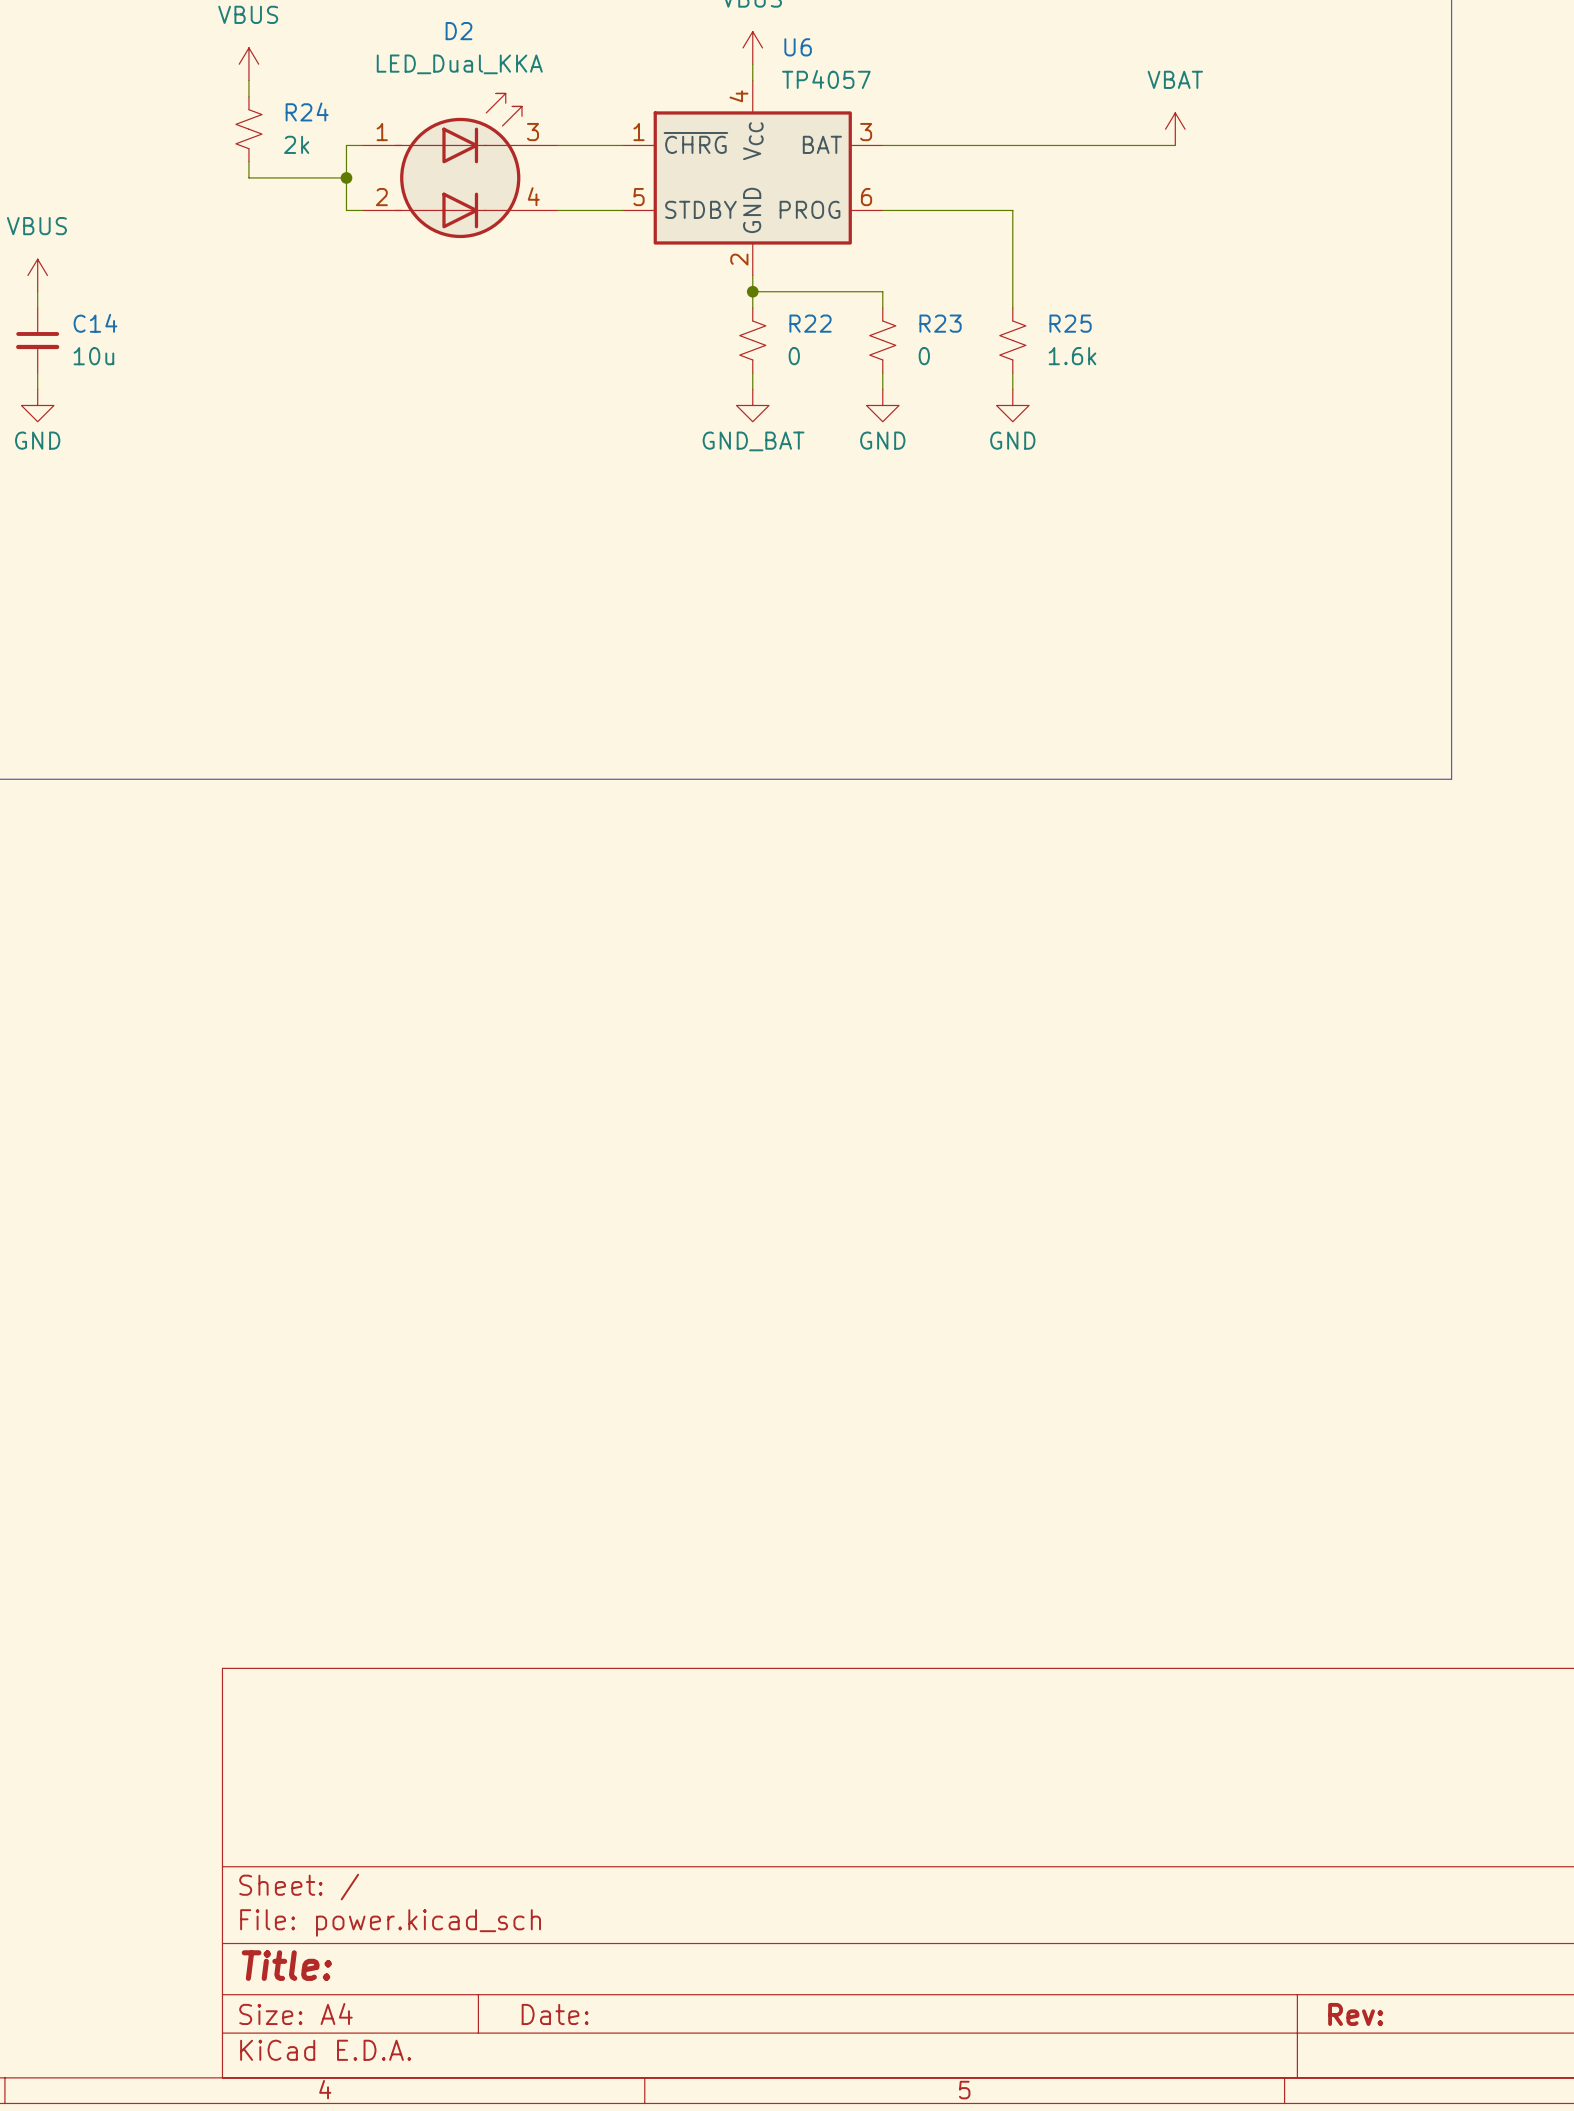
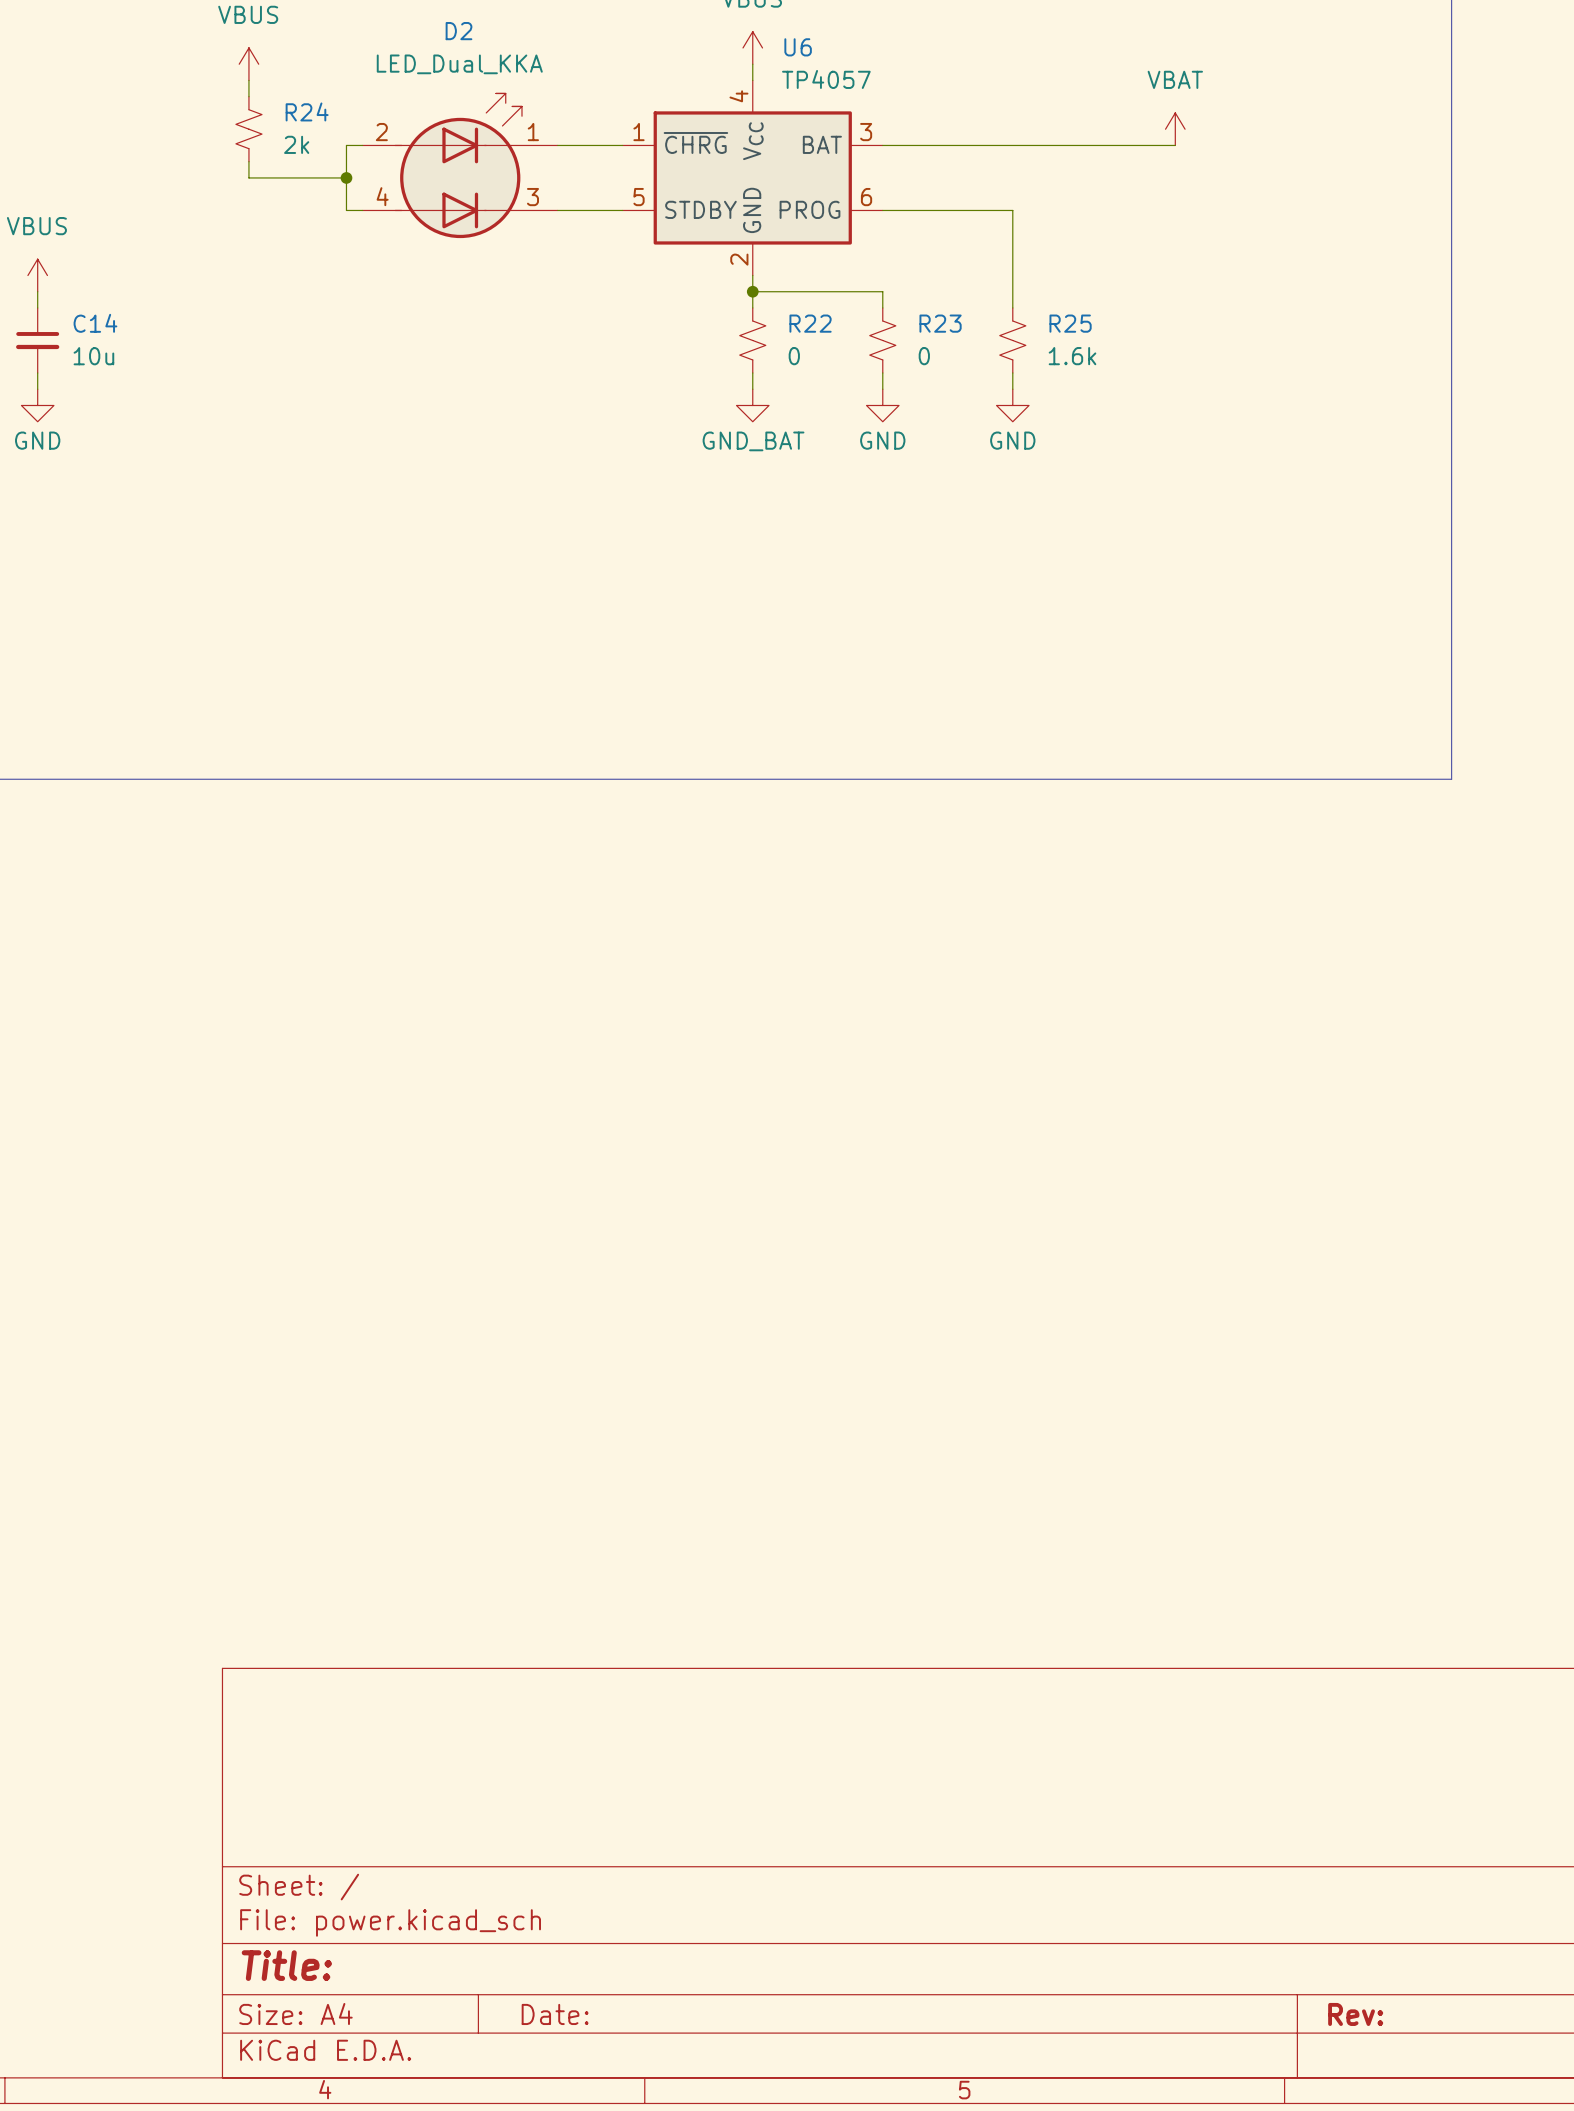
D2 pin number: 1 (382, 132) -> 2 (381, 132)
D2 pin number: 3 (532, 132) -> 1 (533, 132)
D2 pin number: 4 (533, 196) -> 3 (532, 197)
D2 pin number: 2 (381, 197) -> 4 (382, 196)

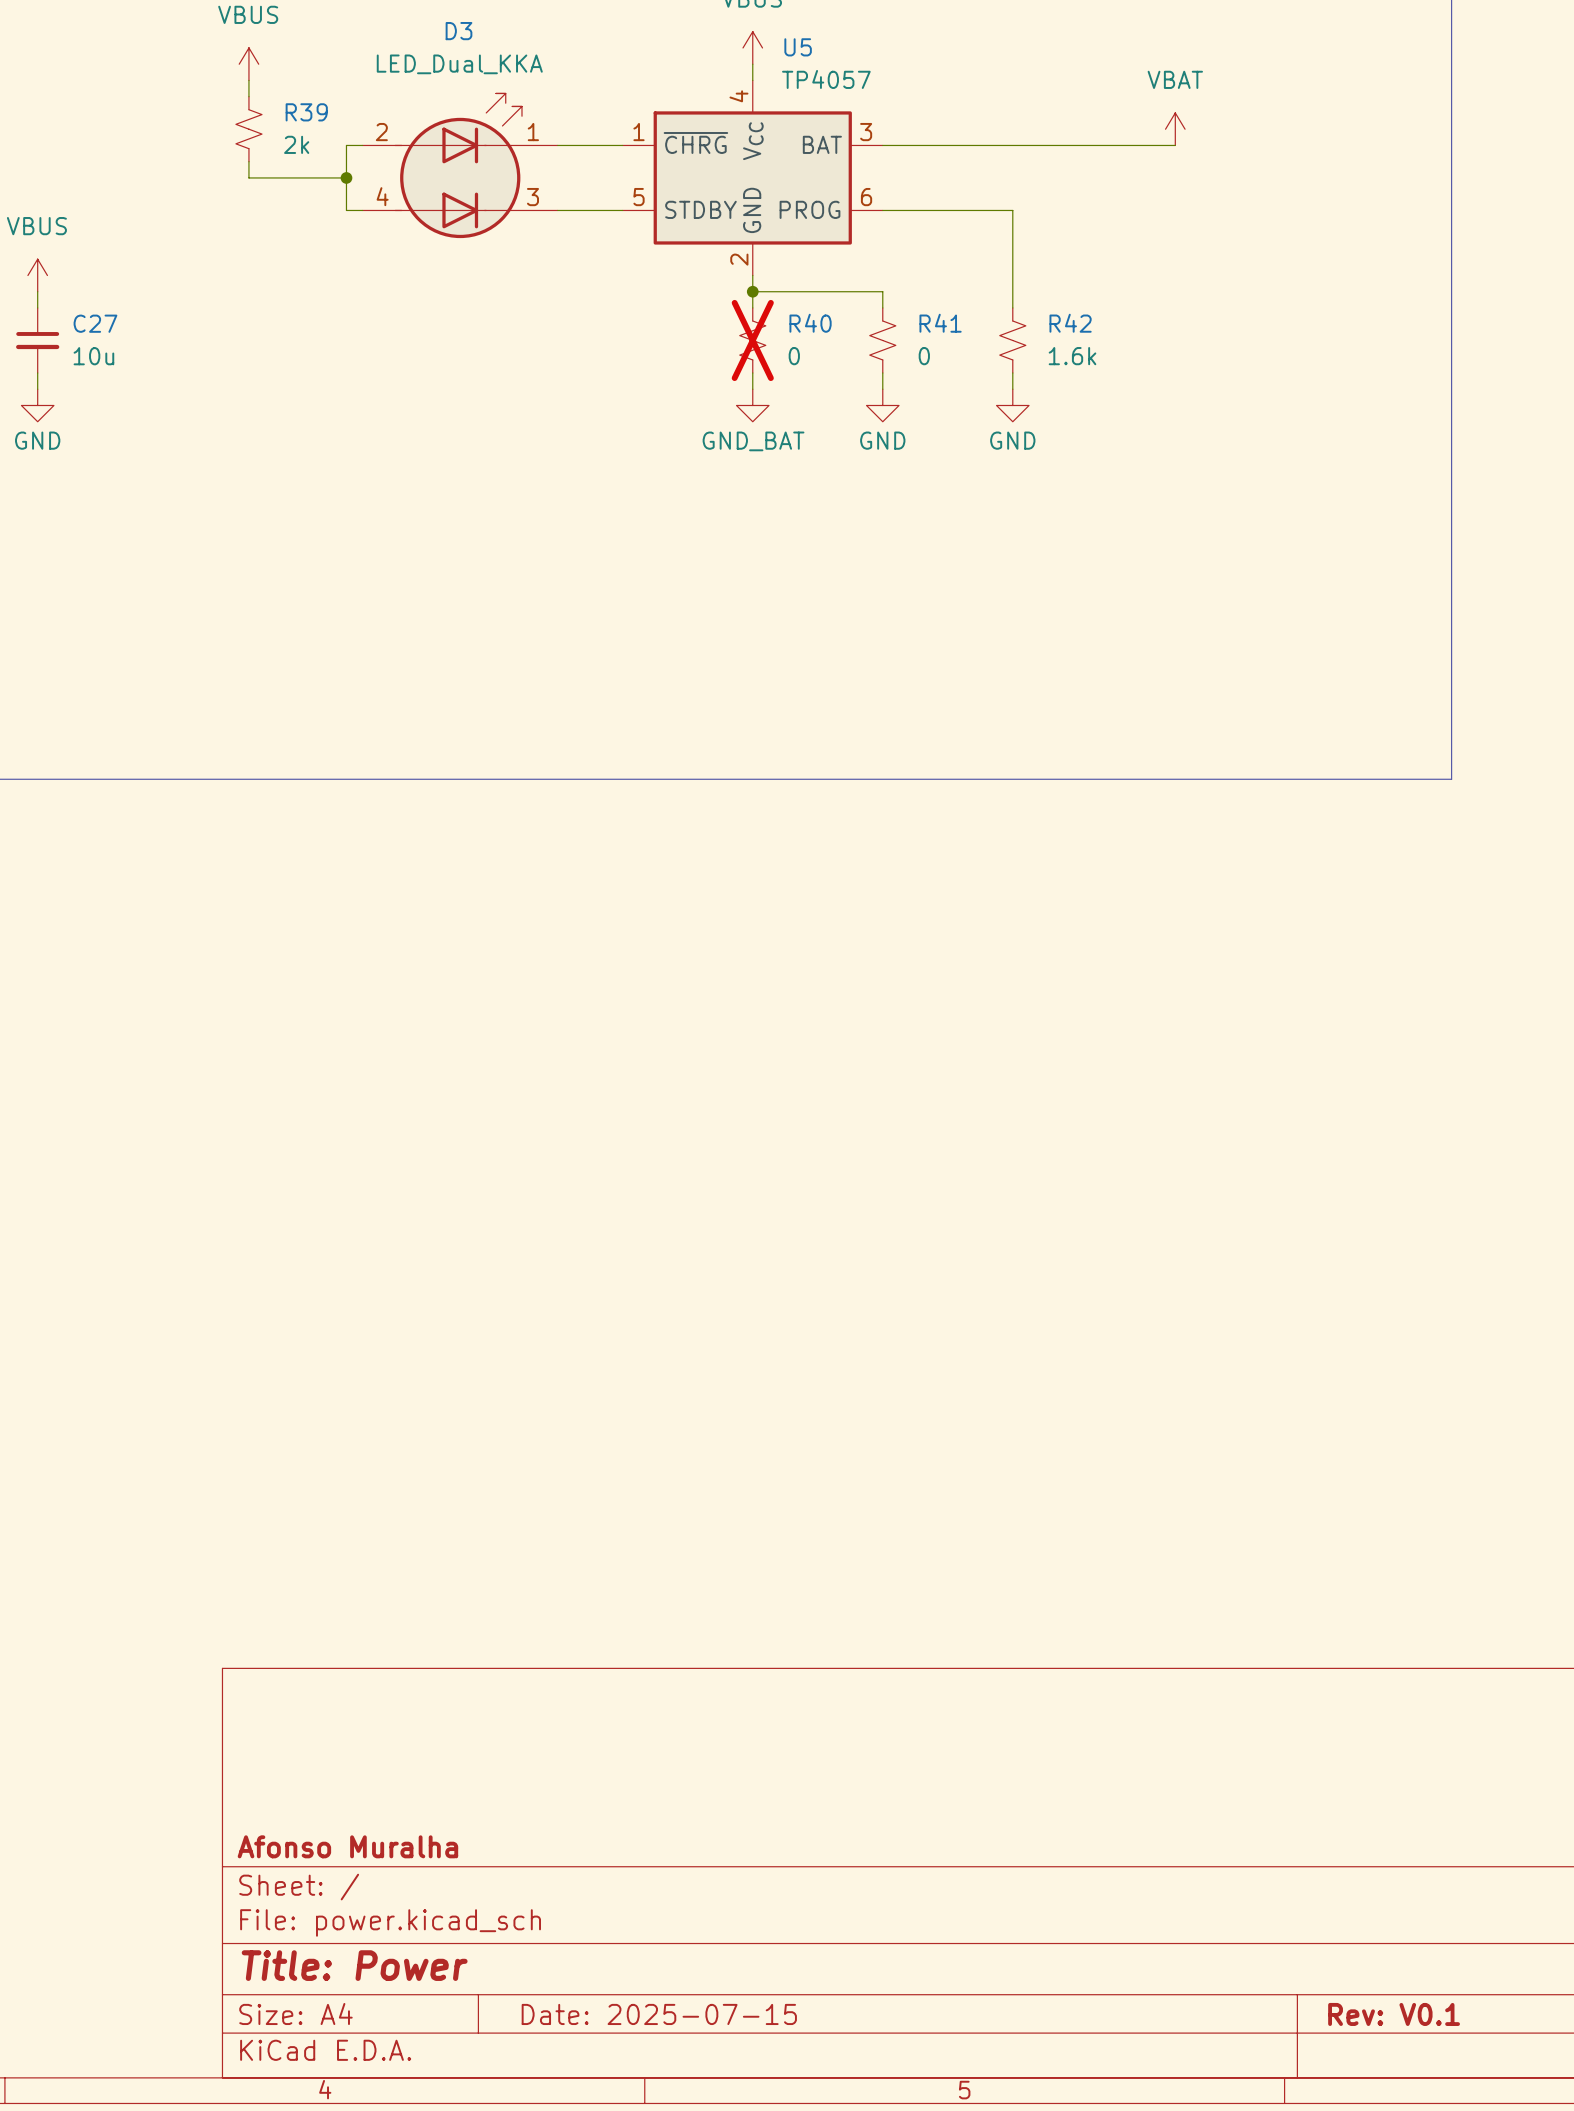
D2 name: D2 (458, 31) -> D3 (458, 31)
U6 name: U6 (798, 47) -> U5 (798, 47)
R24 name: R24 (307, 111) -> R39 (306, 112)
C14 name: C14 (95, 323) -> C27 (95, 323)
R22 name: R22 (810, 323) -> R40 (810, 323)
R23 name: R23 (940, 323) -> R41 (940, 323)
R25 name: R25 (1070, 323) -> R42 (1070, 323)
R22 do-not-place cross: none -> (752, 340)
title block: none -> Afonso Muralha (347, 1846)
title block: Title: (286, 1965) -> Title: Power (354, 1965)
title block: Date: (555, 2014) -> Date: 2025-07-15 (659, 2014)
title block: Rev: (1355, 2014) -> Rev: V0.1 (1394, 2014)

